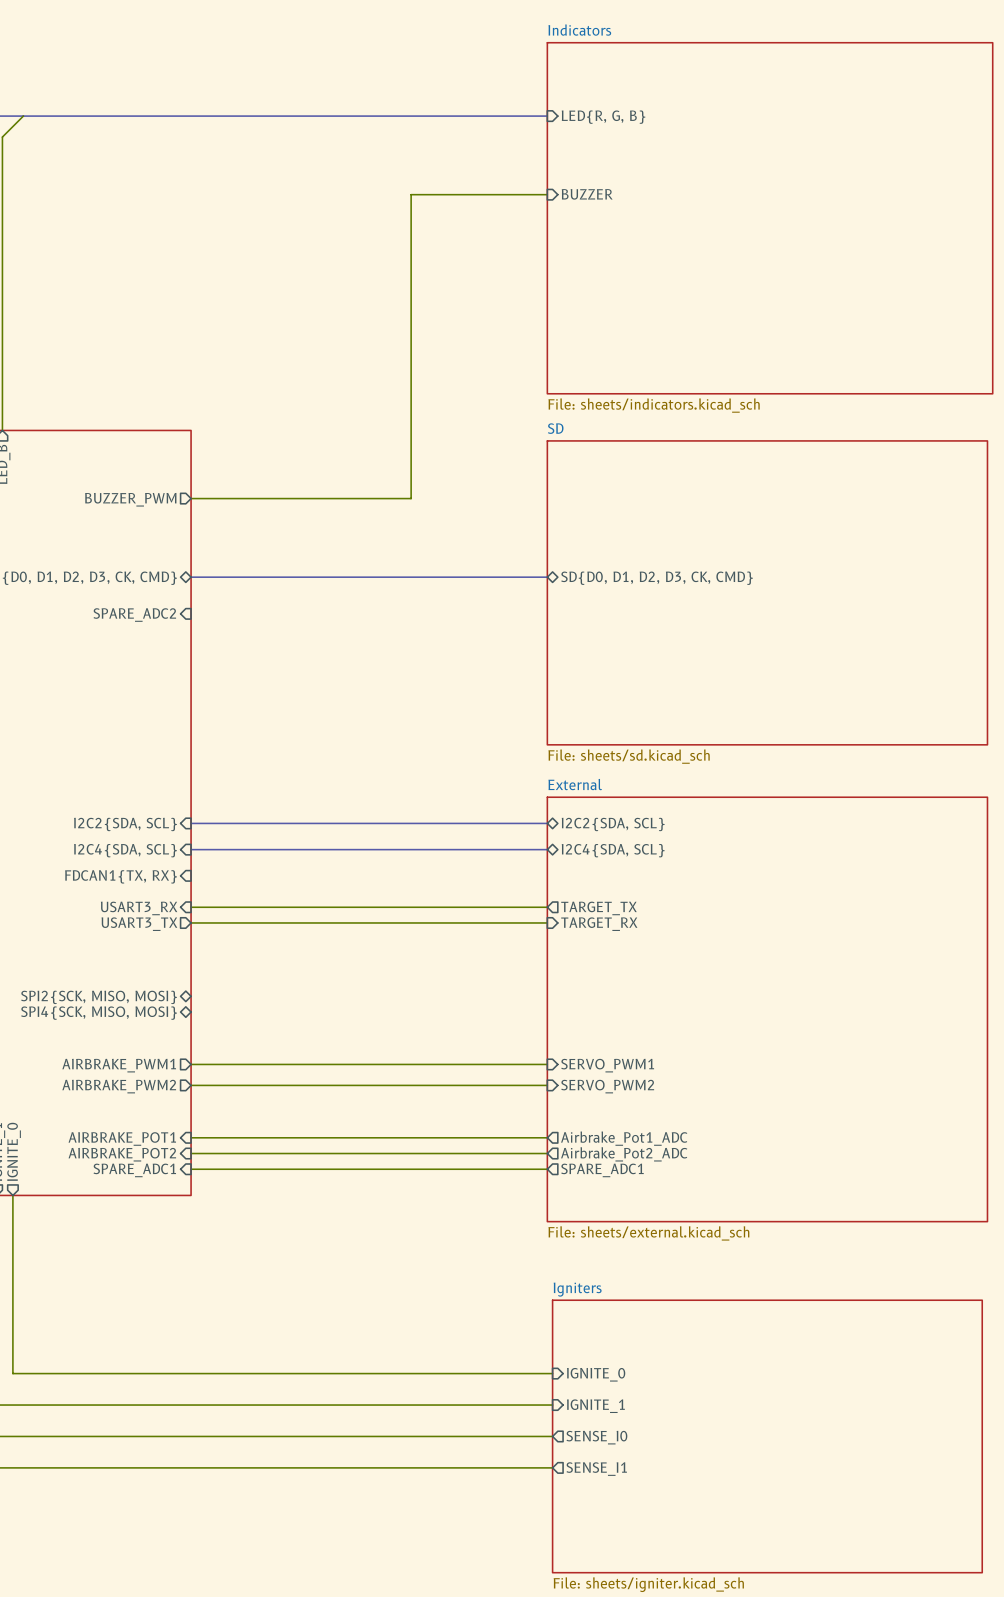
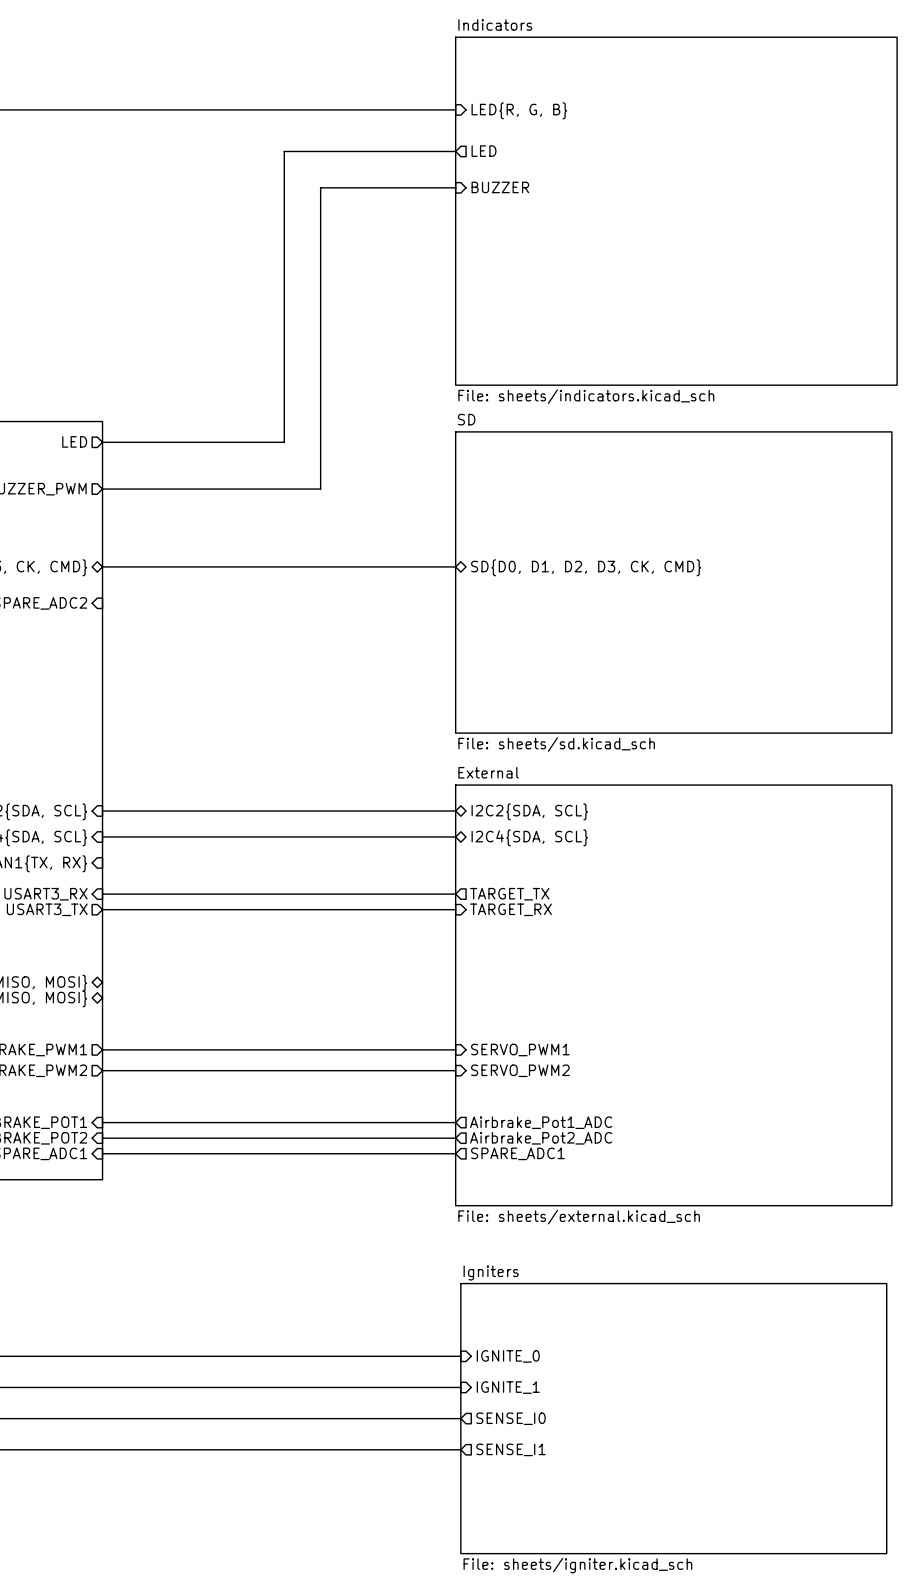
sheet pin: none -> LED (484, 151)
wire: none -> (455, 151) (284, 151) (284, 442) (102, 442)
sheet pin: none -> LED (74, 441)

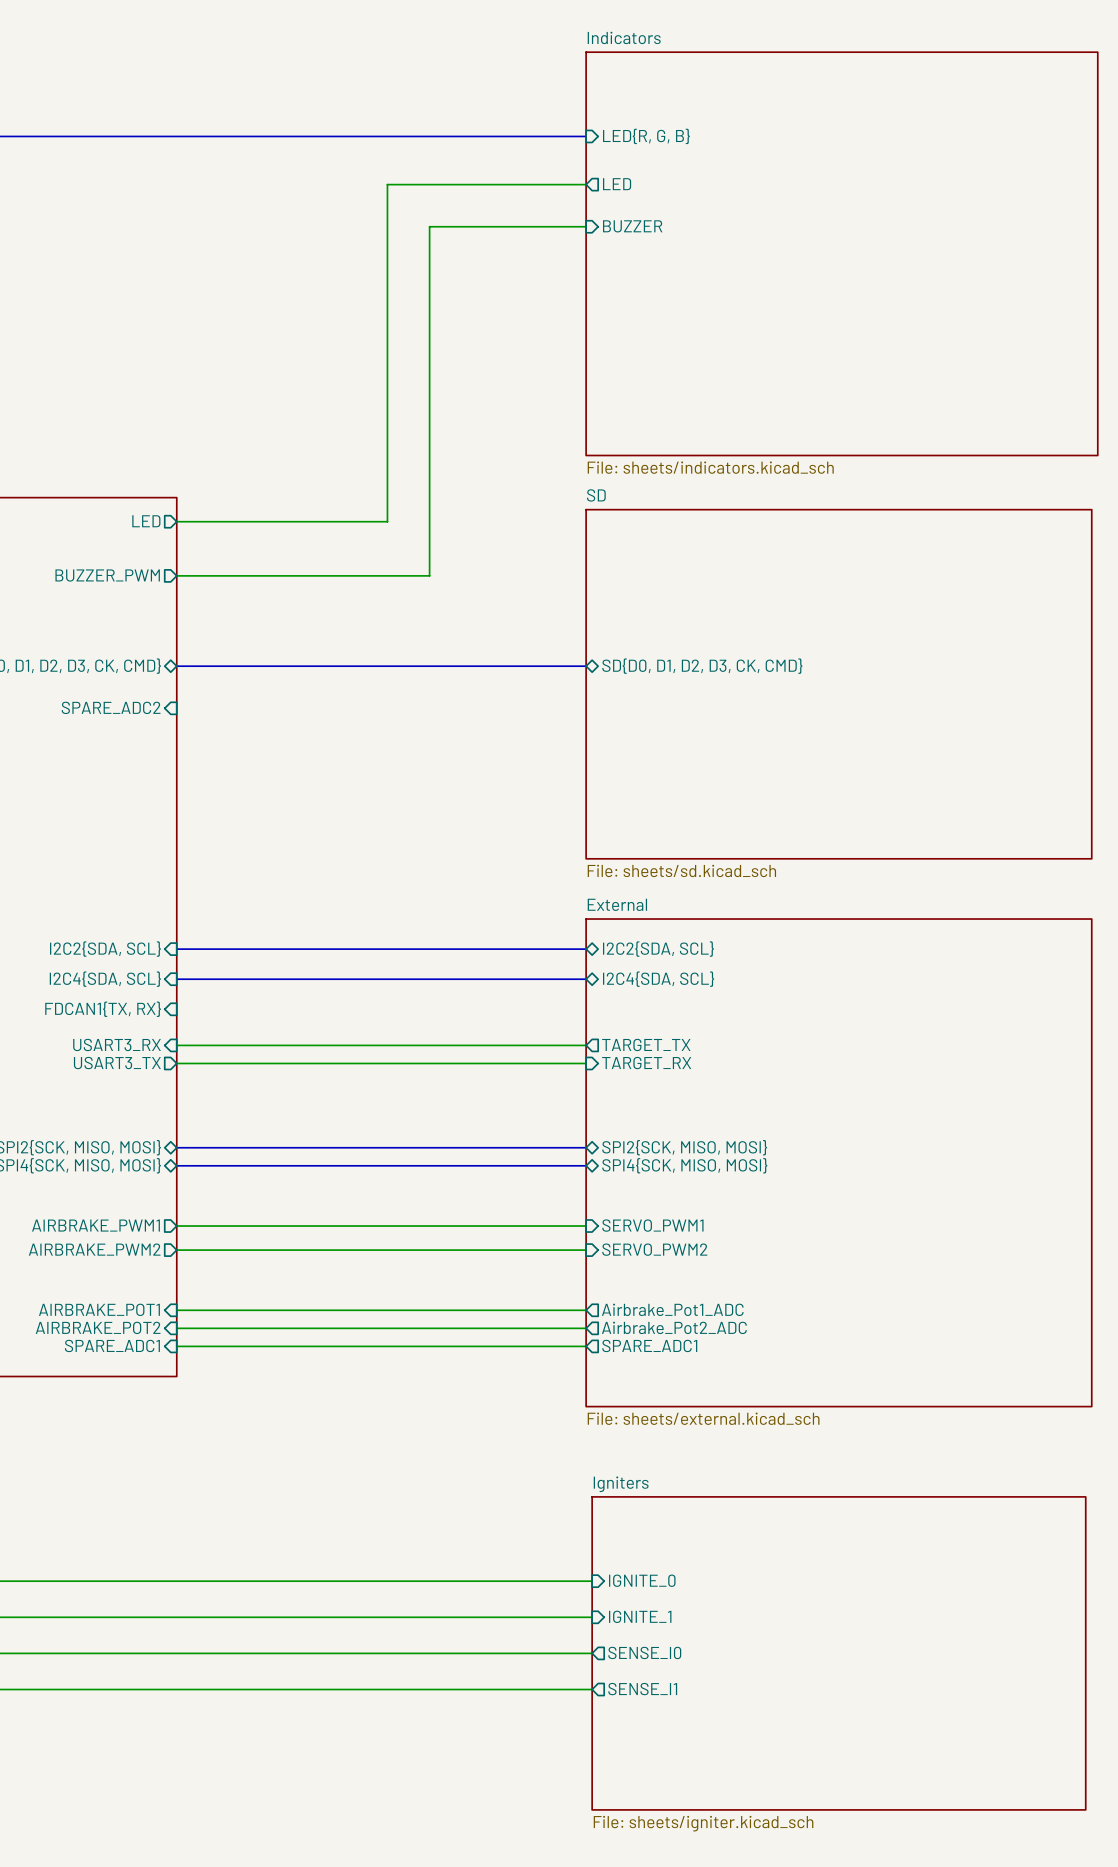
bus: none -> (176, 1147) (586, 1147)
sheet pin: none -> SPI2{SCK, MISO, MOSI} (684, 1147)
bus: none -> (176, 1165) (586, 1165)
sheet pin: none -> SPI4{SCK, MISO, MOSI} (684, 1165)

